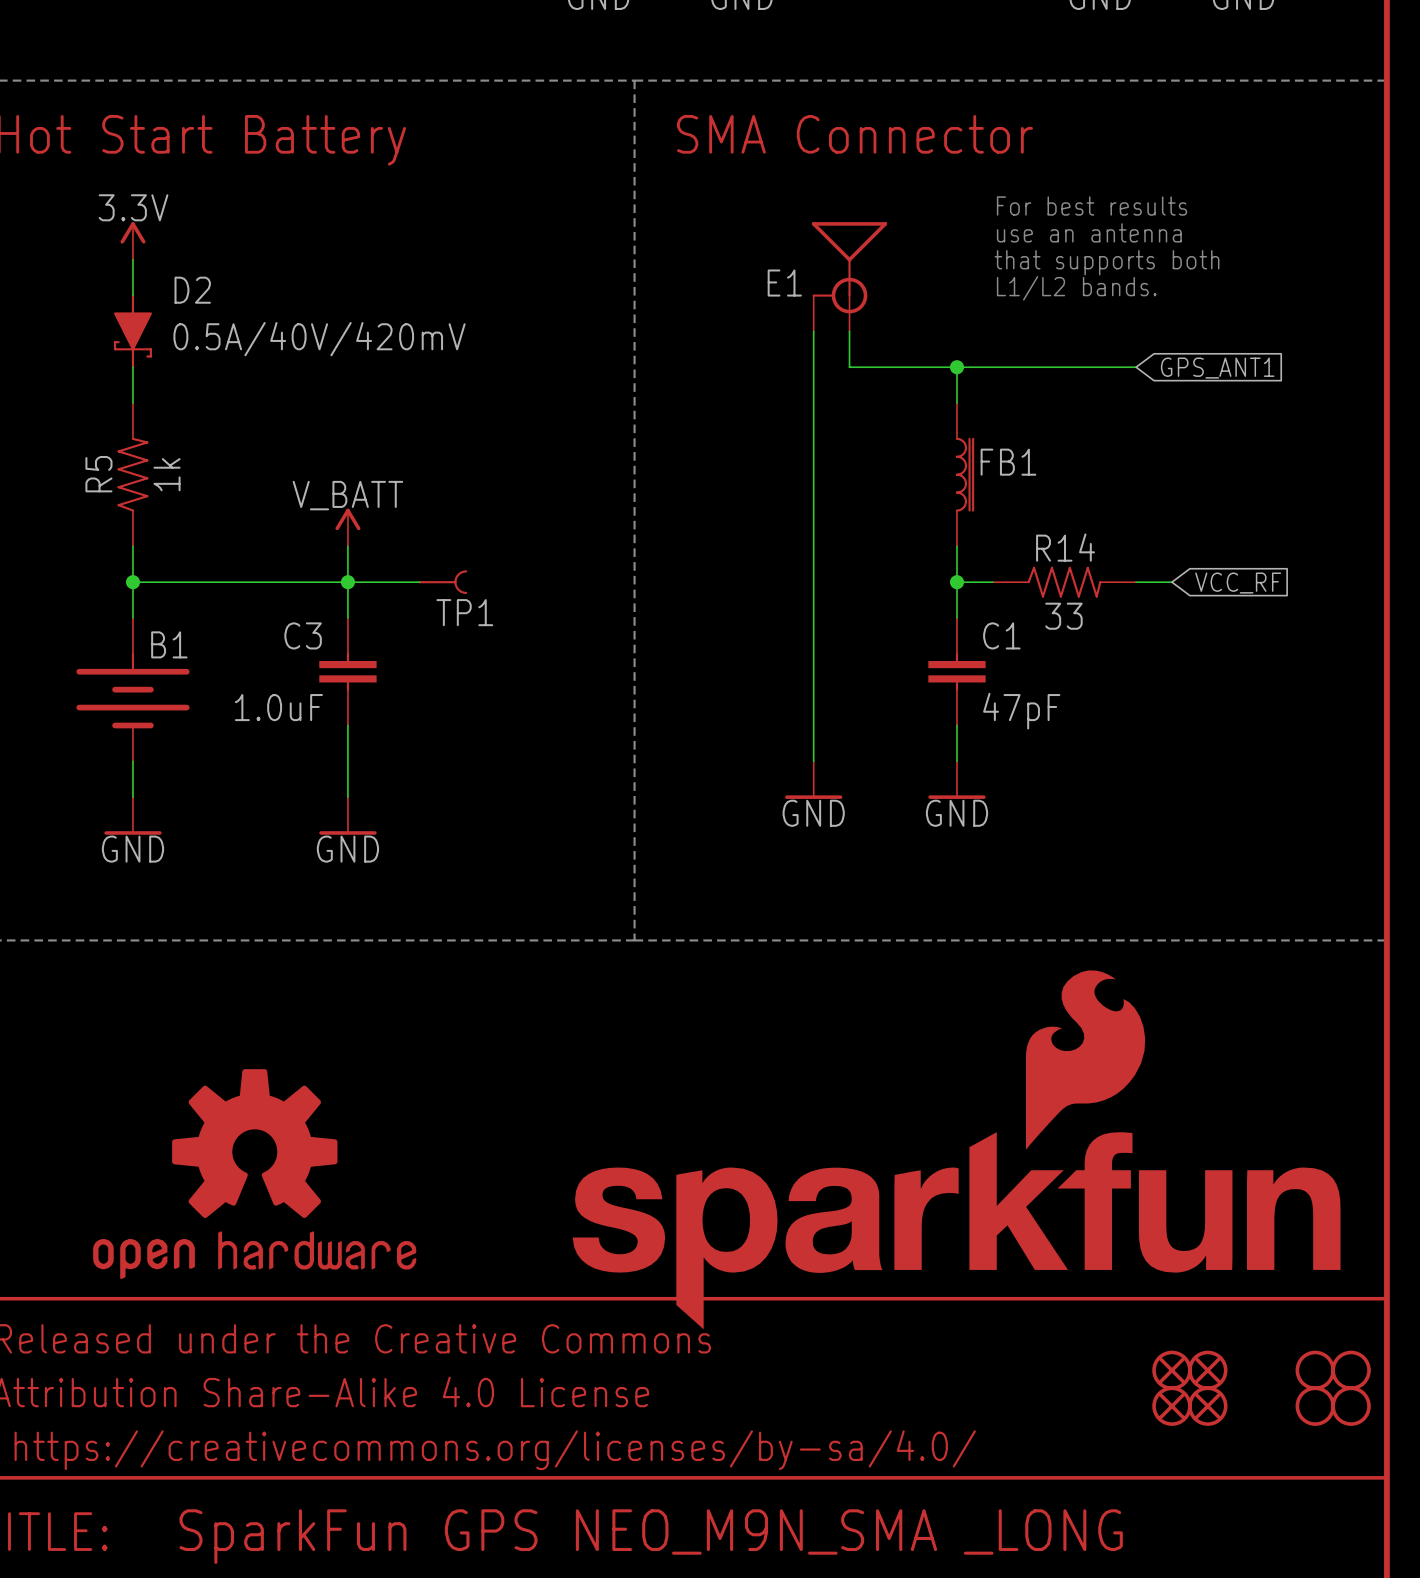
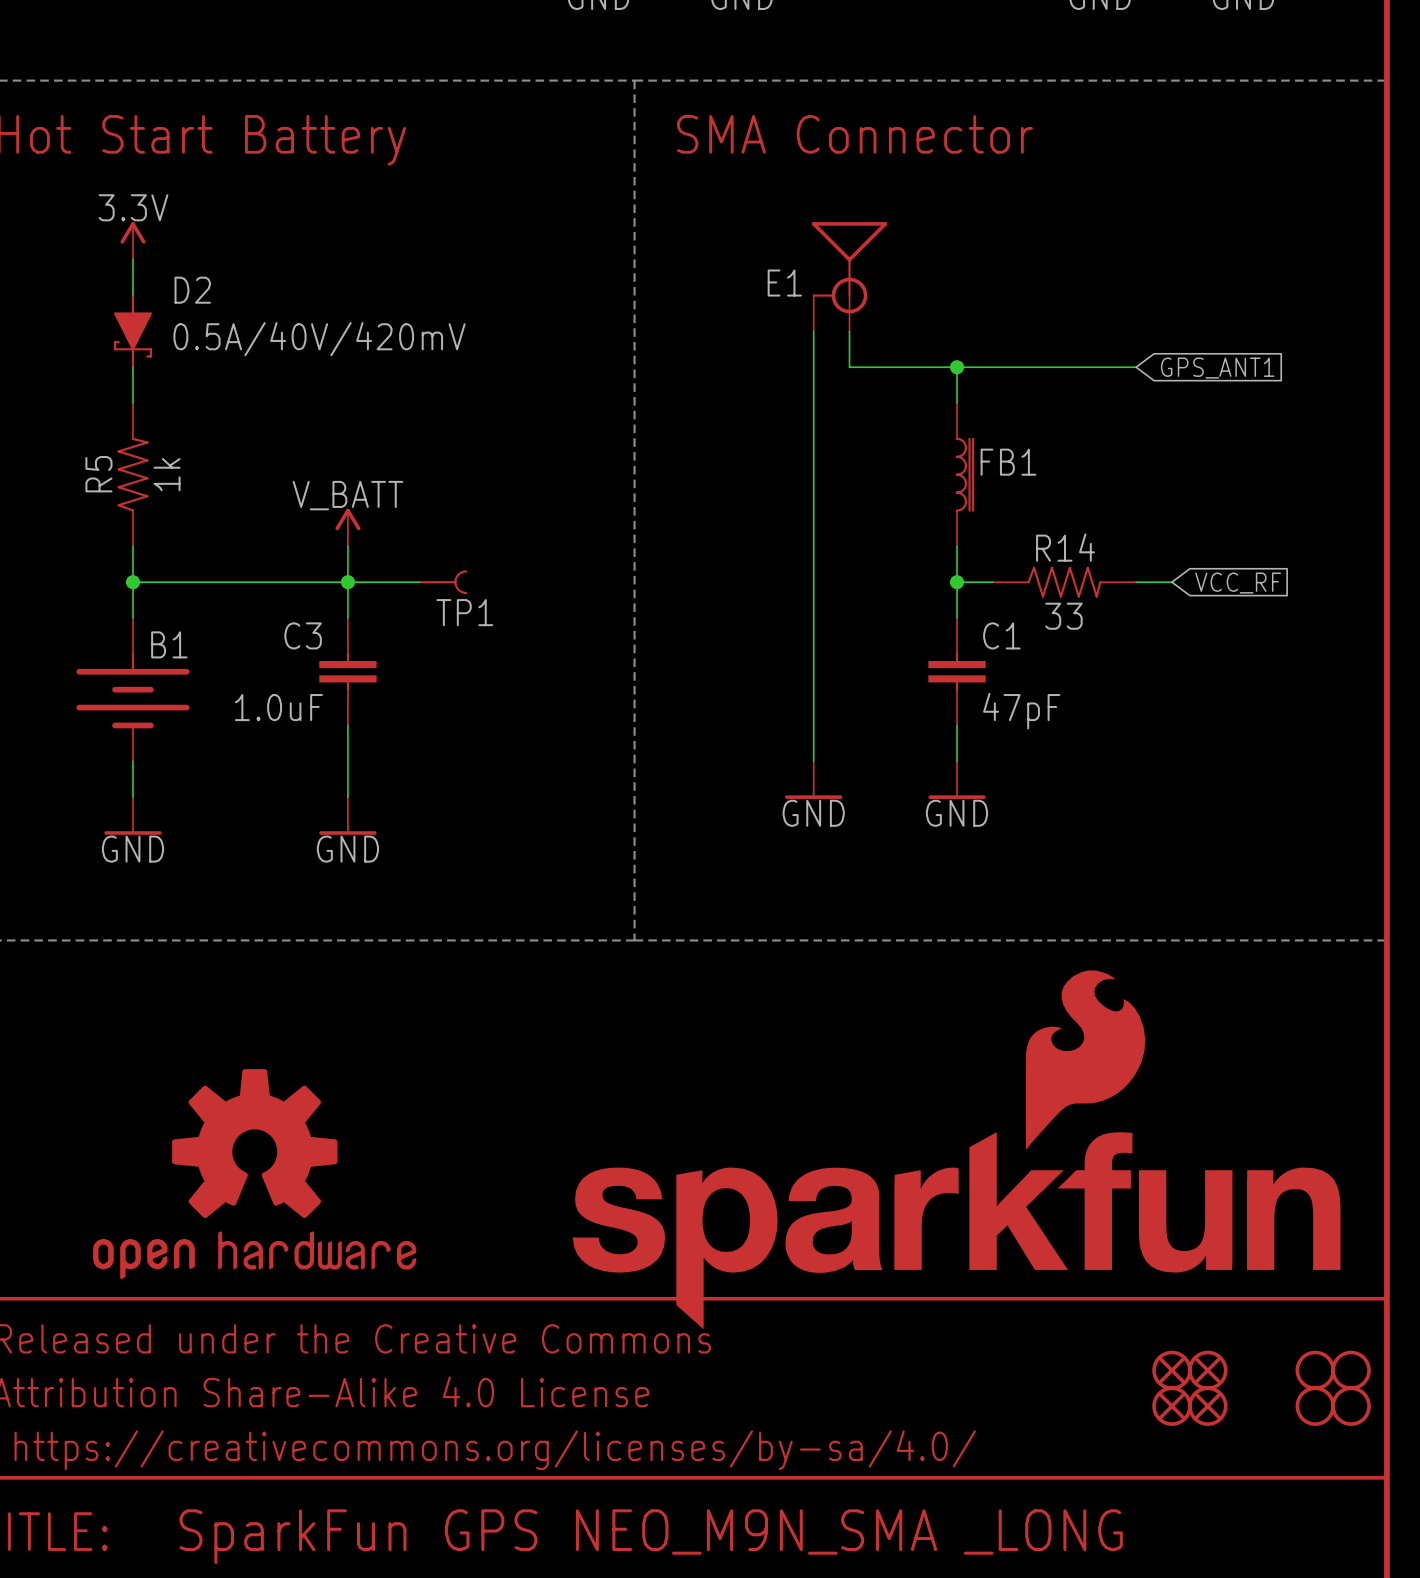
text: For best results (1092, 206) -> none
text: use an antenna (1089, 232) -> none
text: that supports both (1107, 262) -> none
text: L1/L2 bands. (1076, 288) -> none

